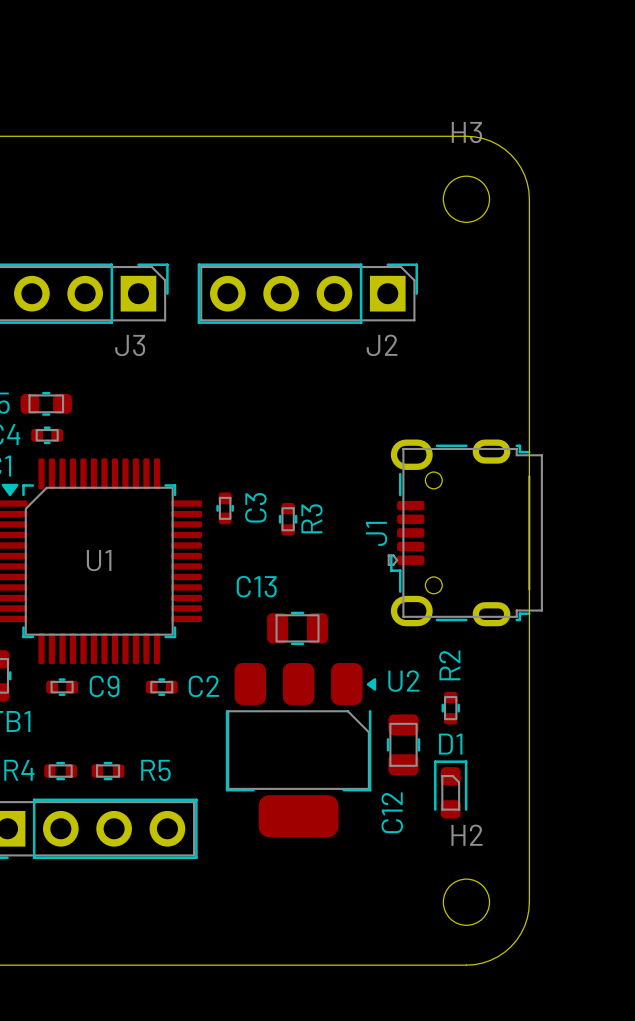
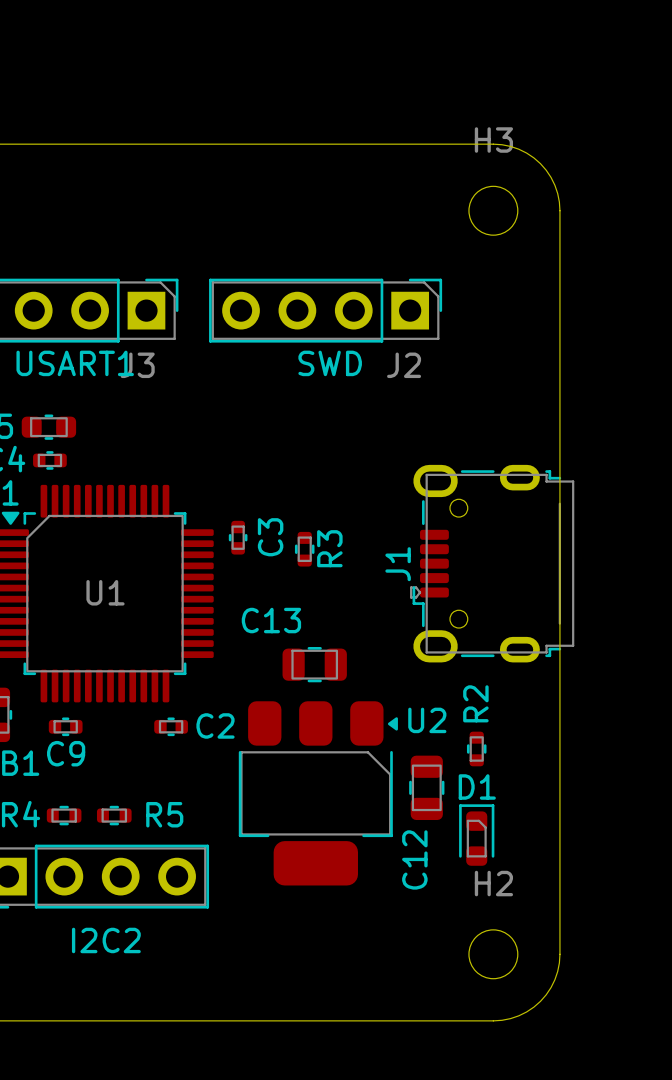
text: none -> USART1 (75, 363)
text: none -> SWD (330, 363)
C9 name position: C9 (104, 686) -> C9 (66, 753)
text: none -> I2C2 (106, 940)

